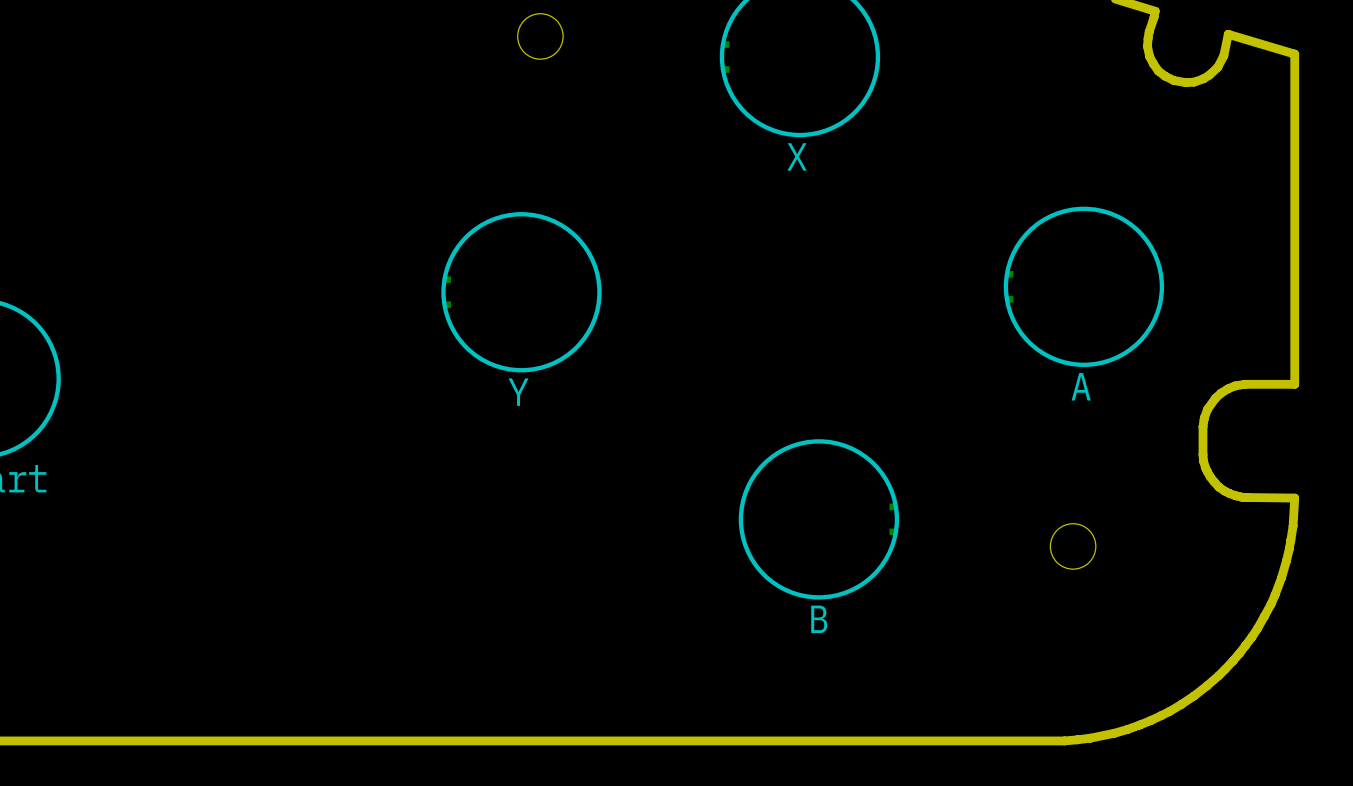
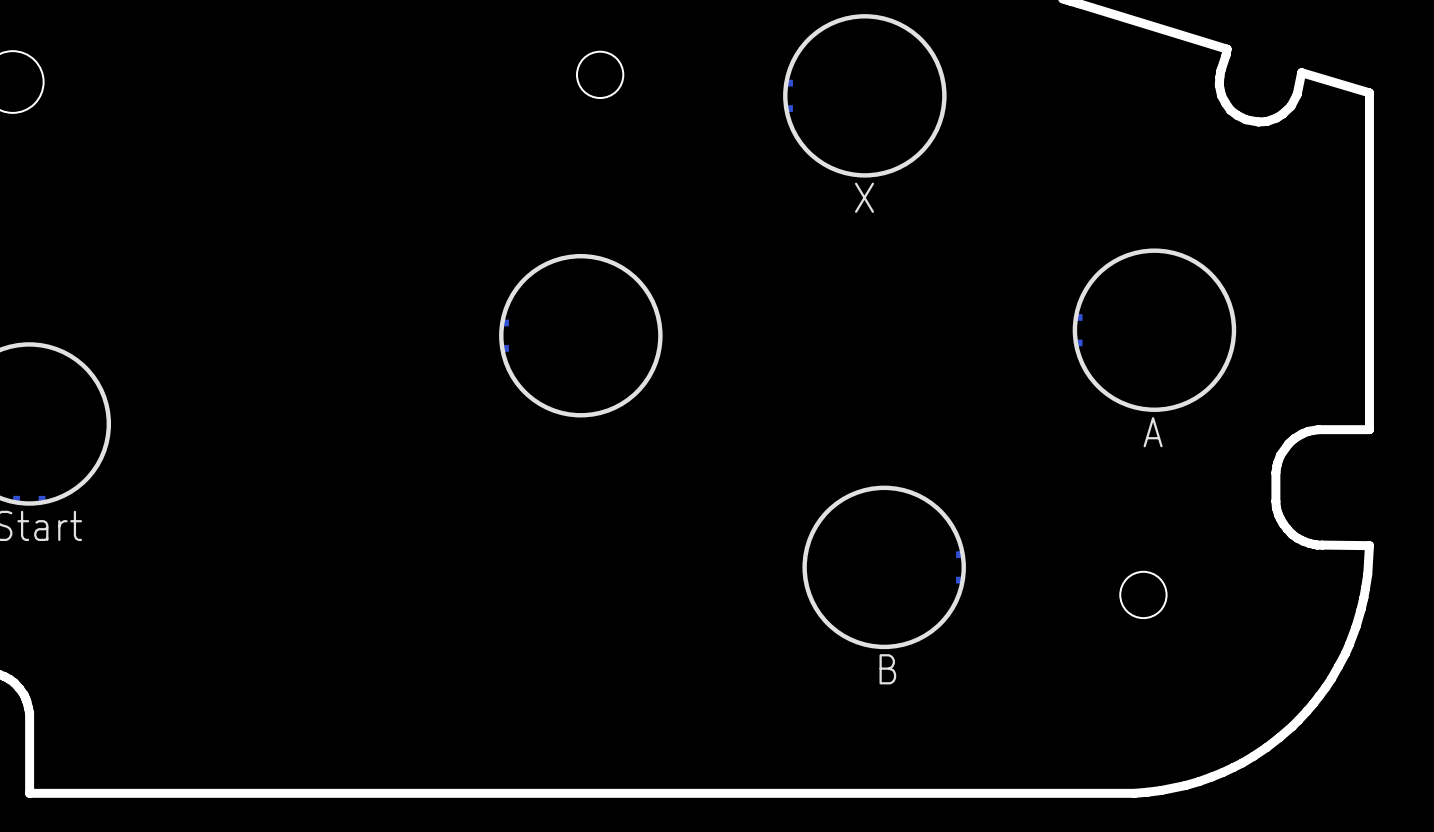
text: Y (518, 392) -> none

